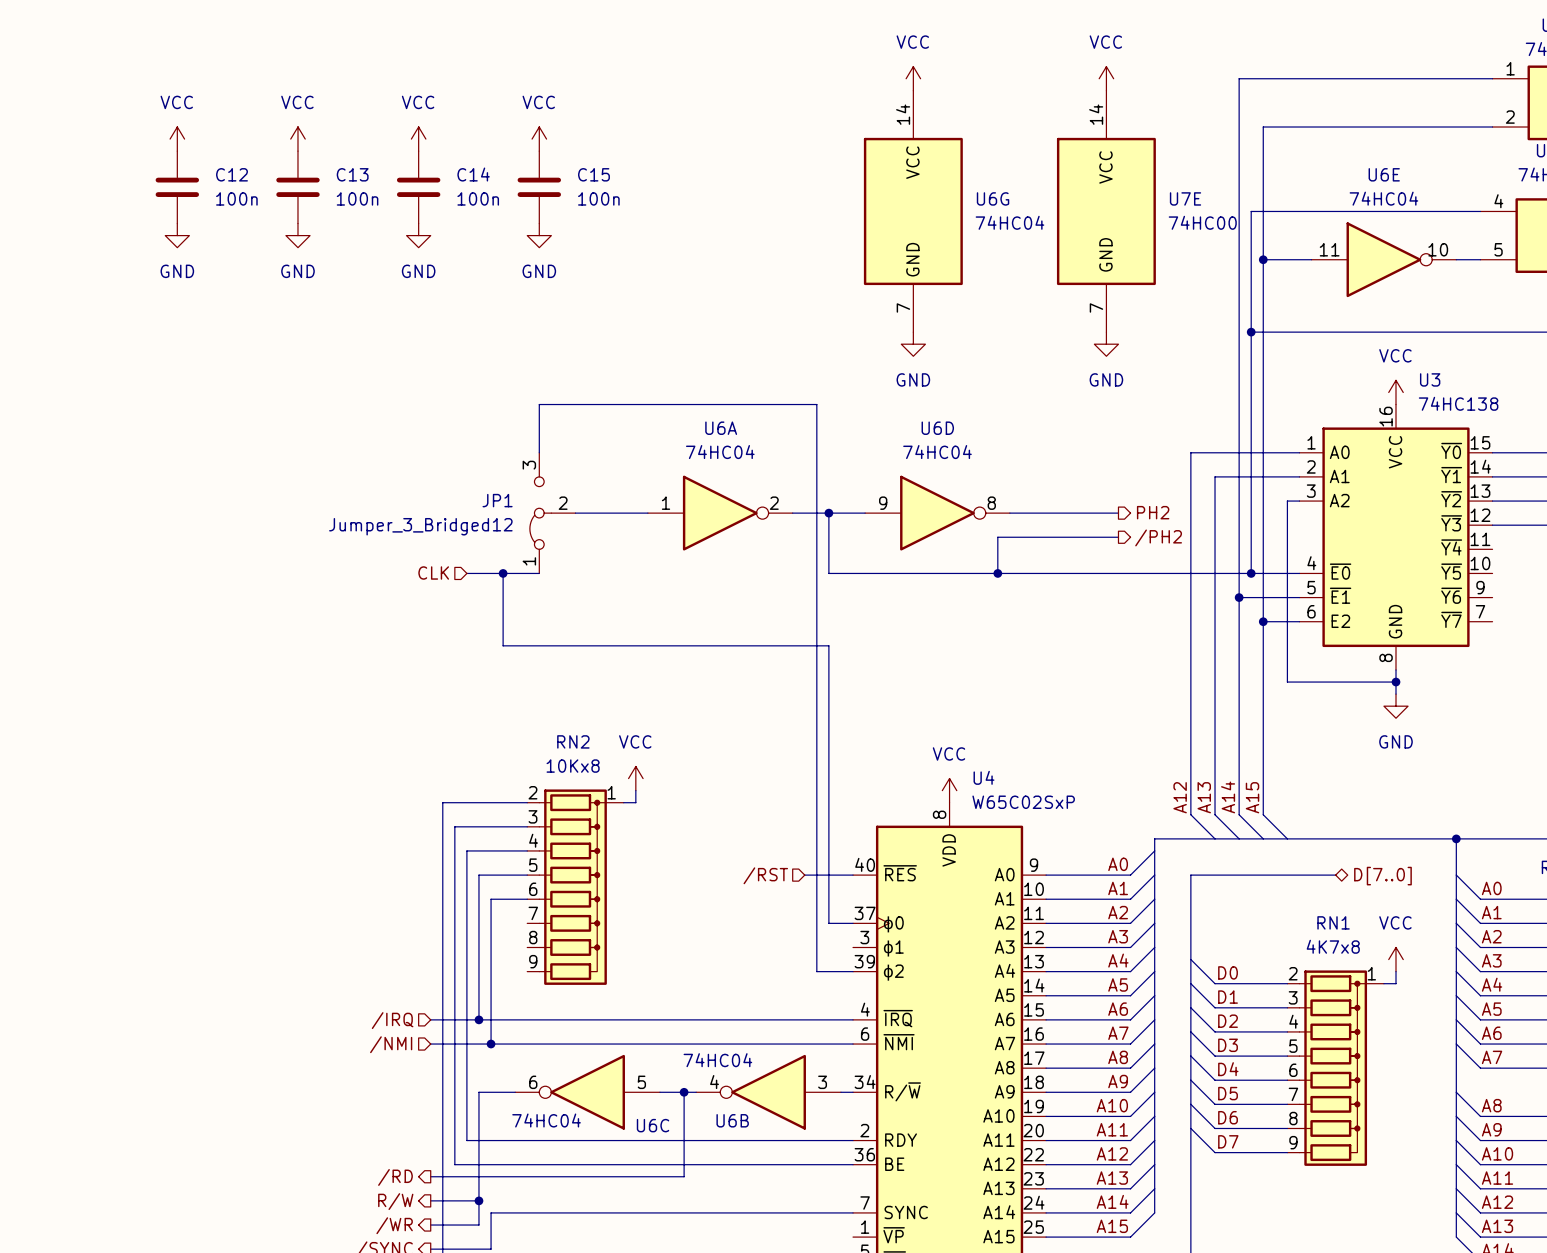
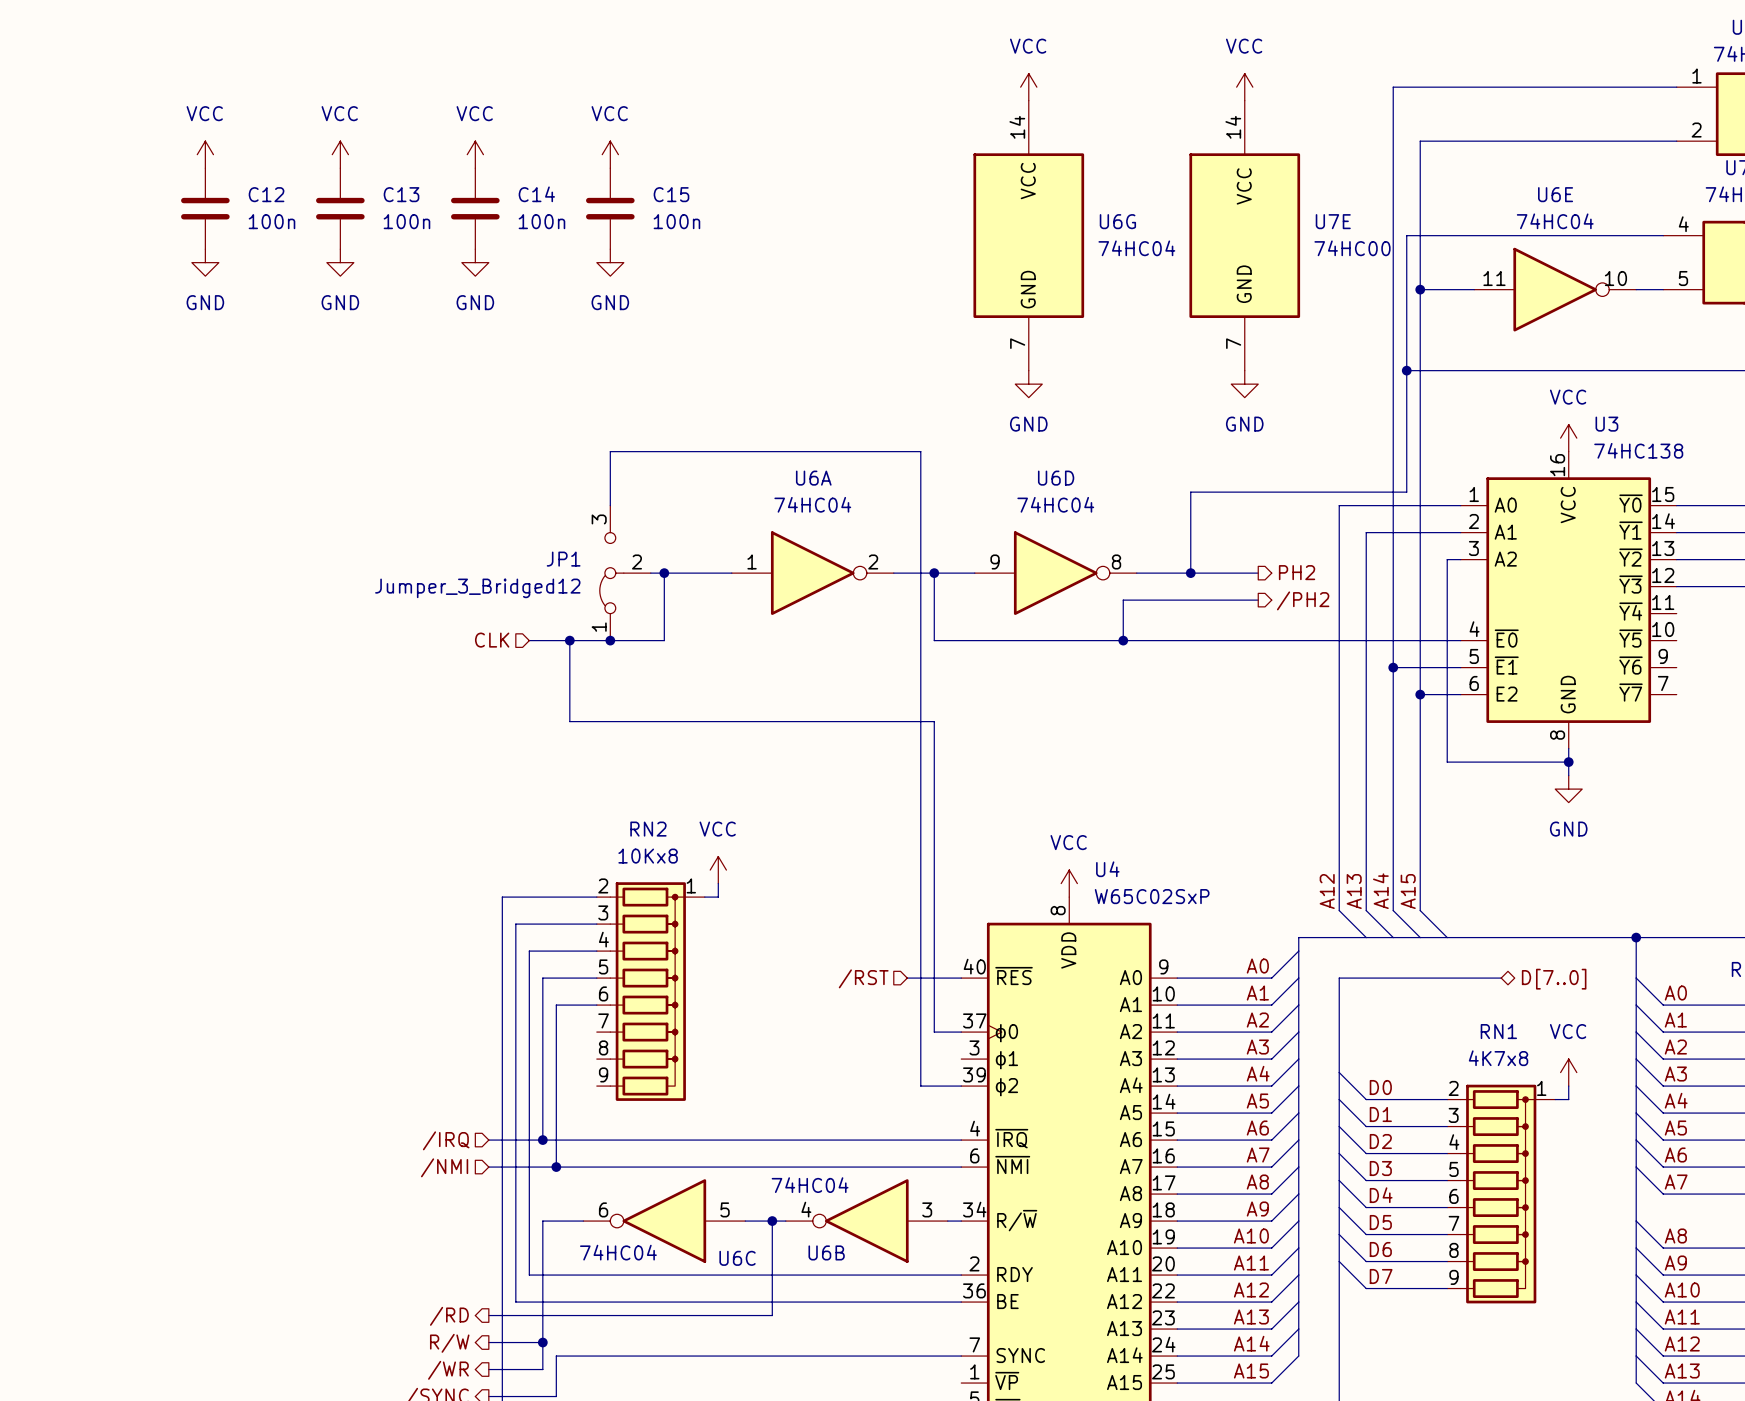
wire: (1251, 440) (1251, 573) -> (1406, 492) (1190, 492) (1190, 573)
wire: none -> (664, 573) (664, 640) (610, 640)
junction: none -> (664, 573)
junction: none -> (1190, 573)
junction: none -> (610, 640)
junction: (1251, 573) -> none

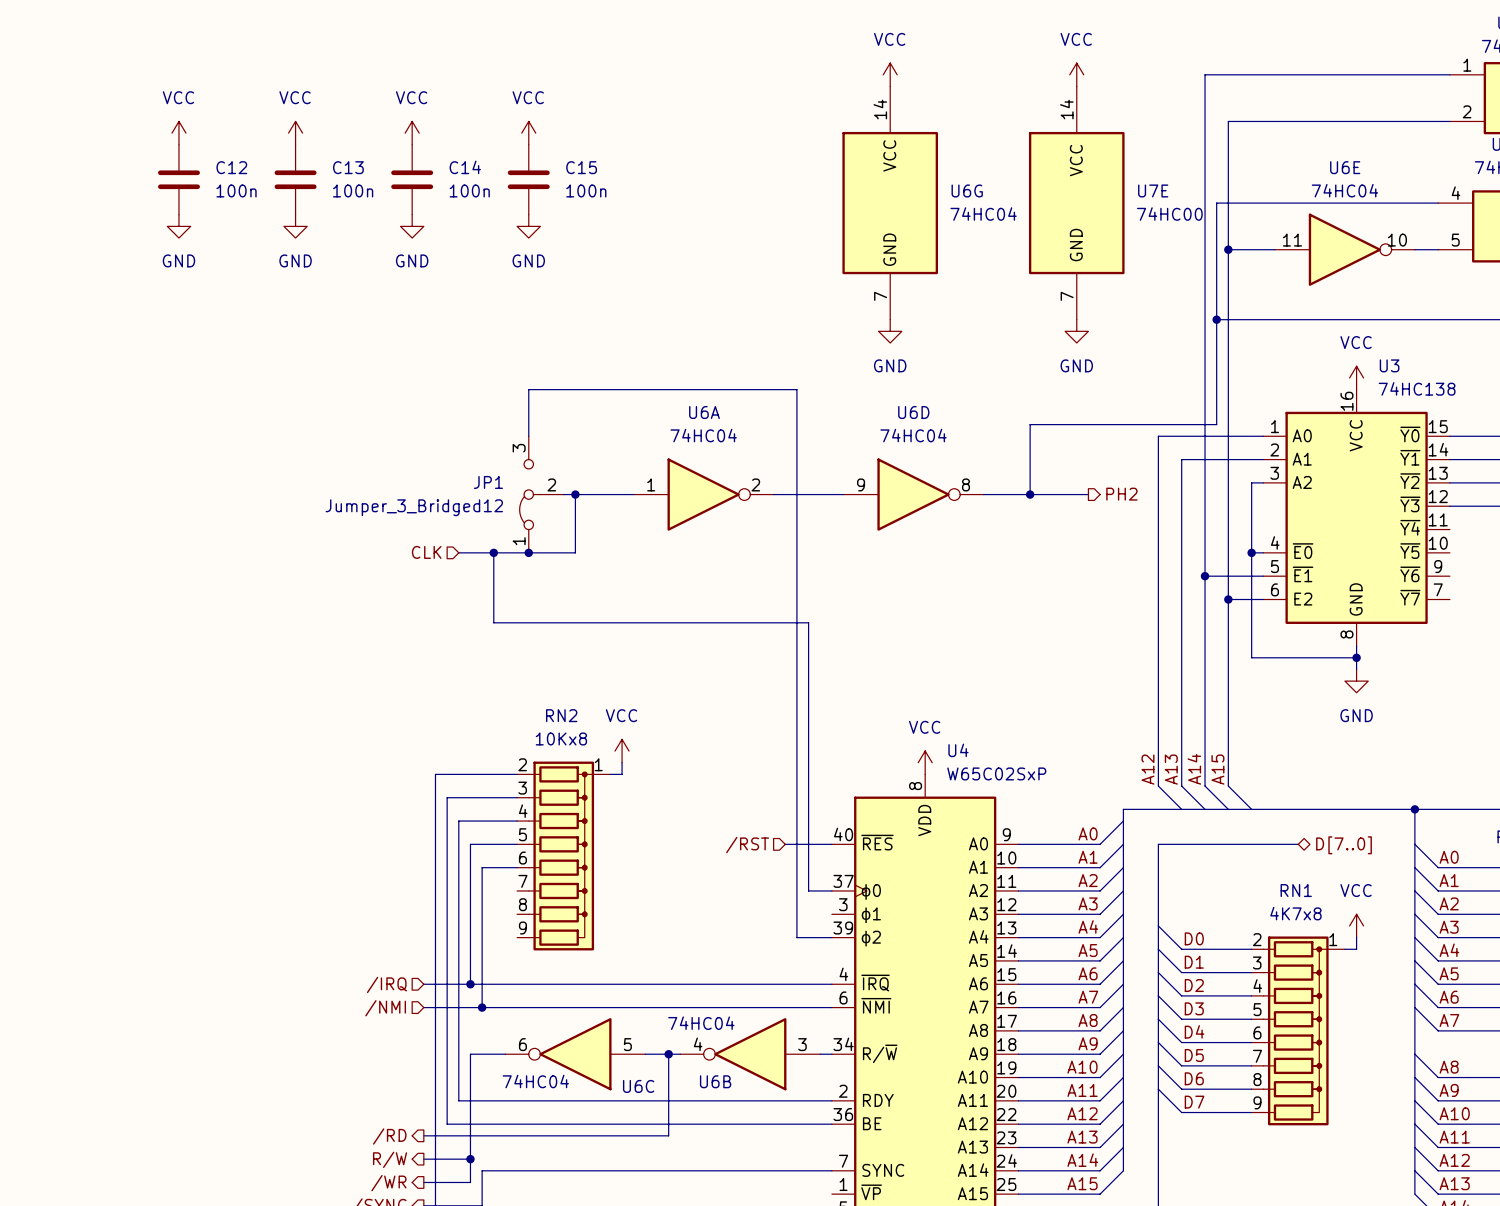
wire: (934, 573) (934, 640) (1447, 640) -> none
junction: (934, 573) -> none
wire: (1258, 600) (1123, 600) (1123, 640) -> none
hierarchical label: /PH2 (1303, 600) -> none
junction: (1123, 640) -> none
junction: none -> (1251, 552)

